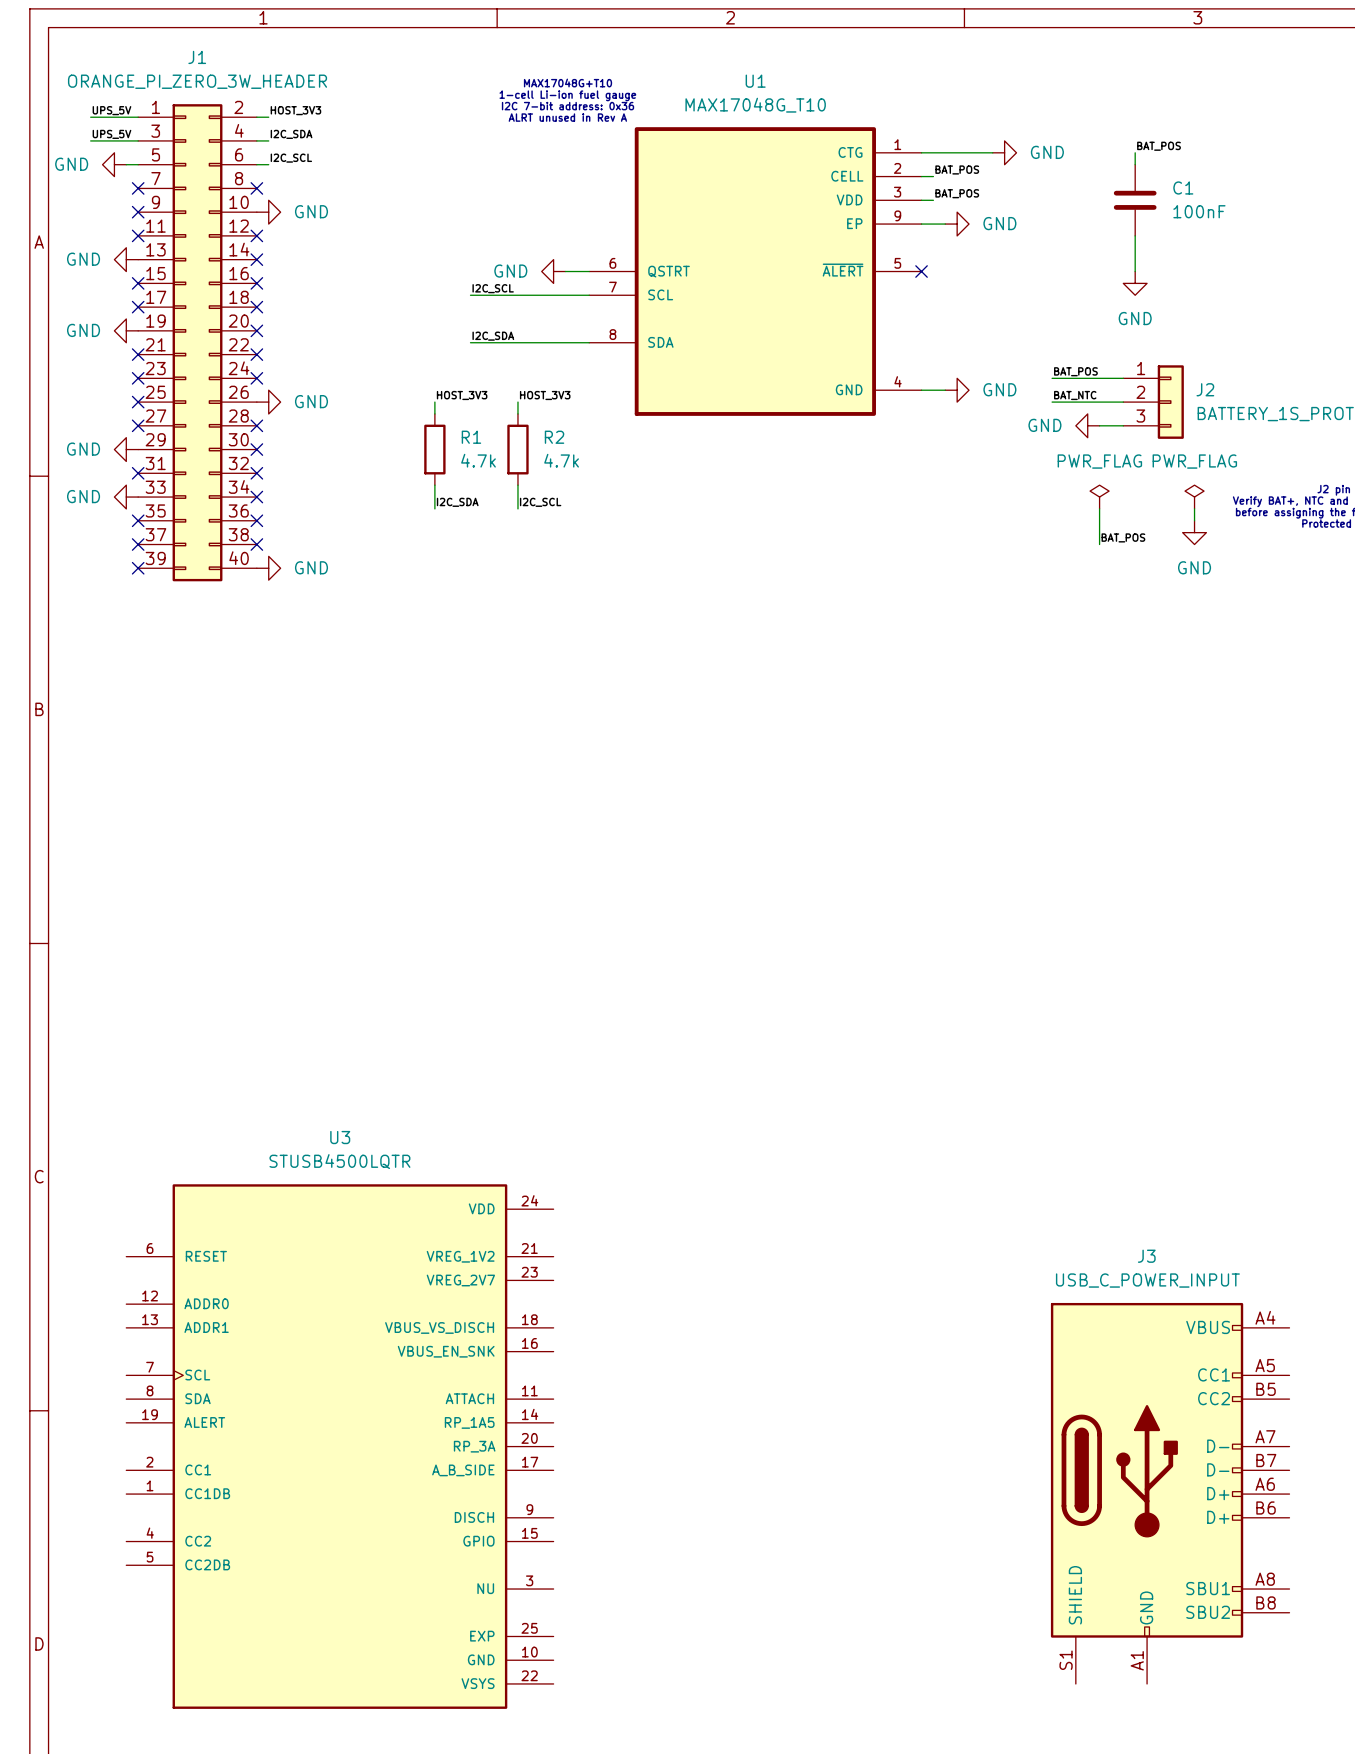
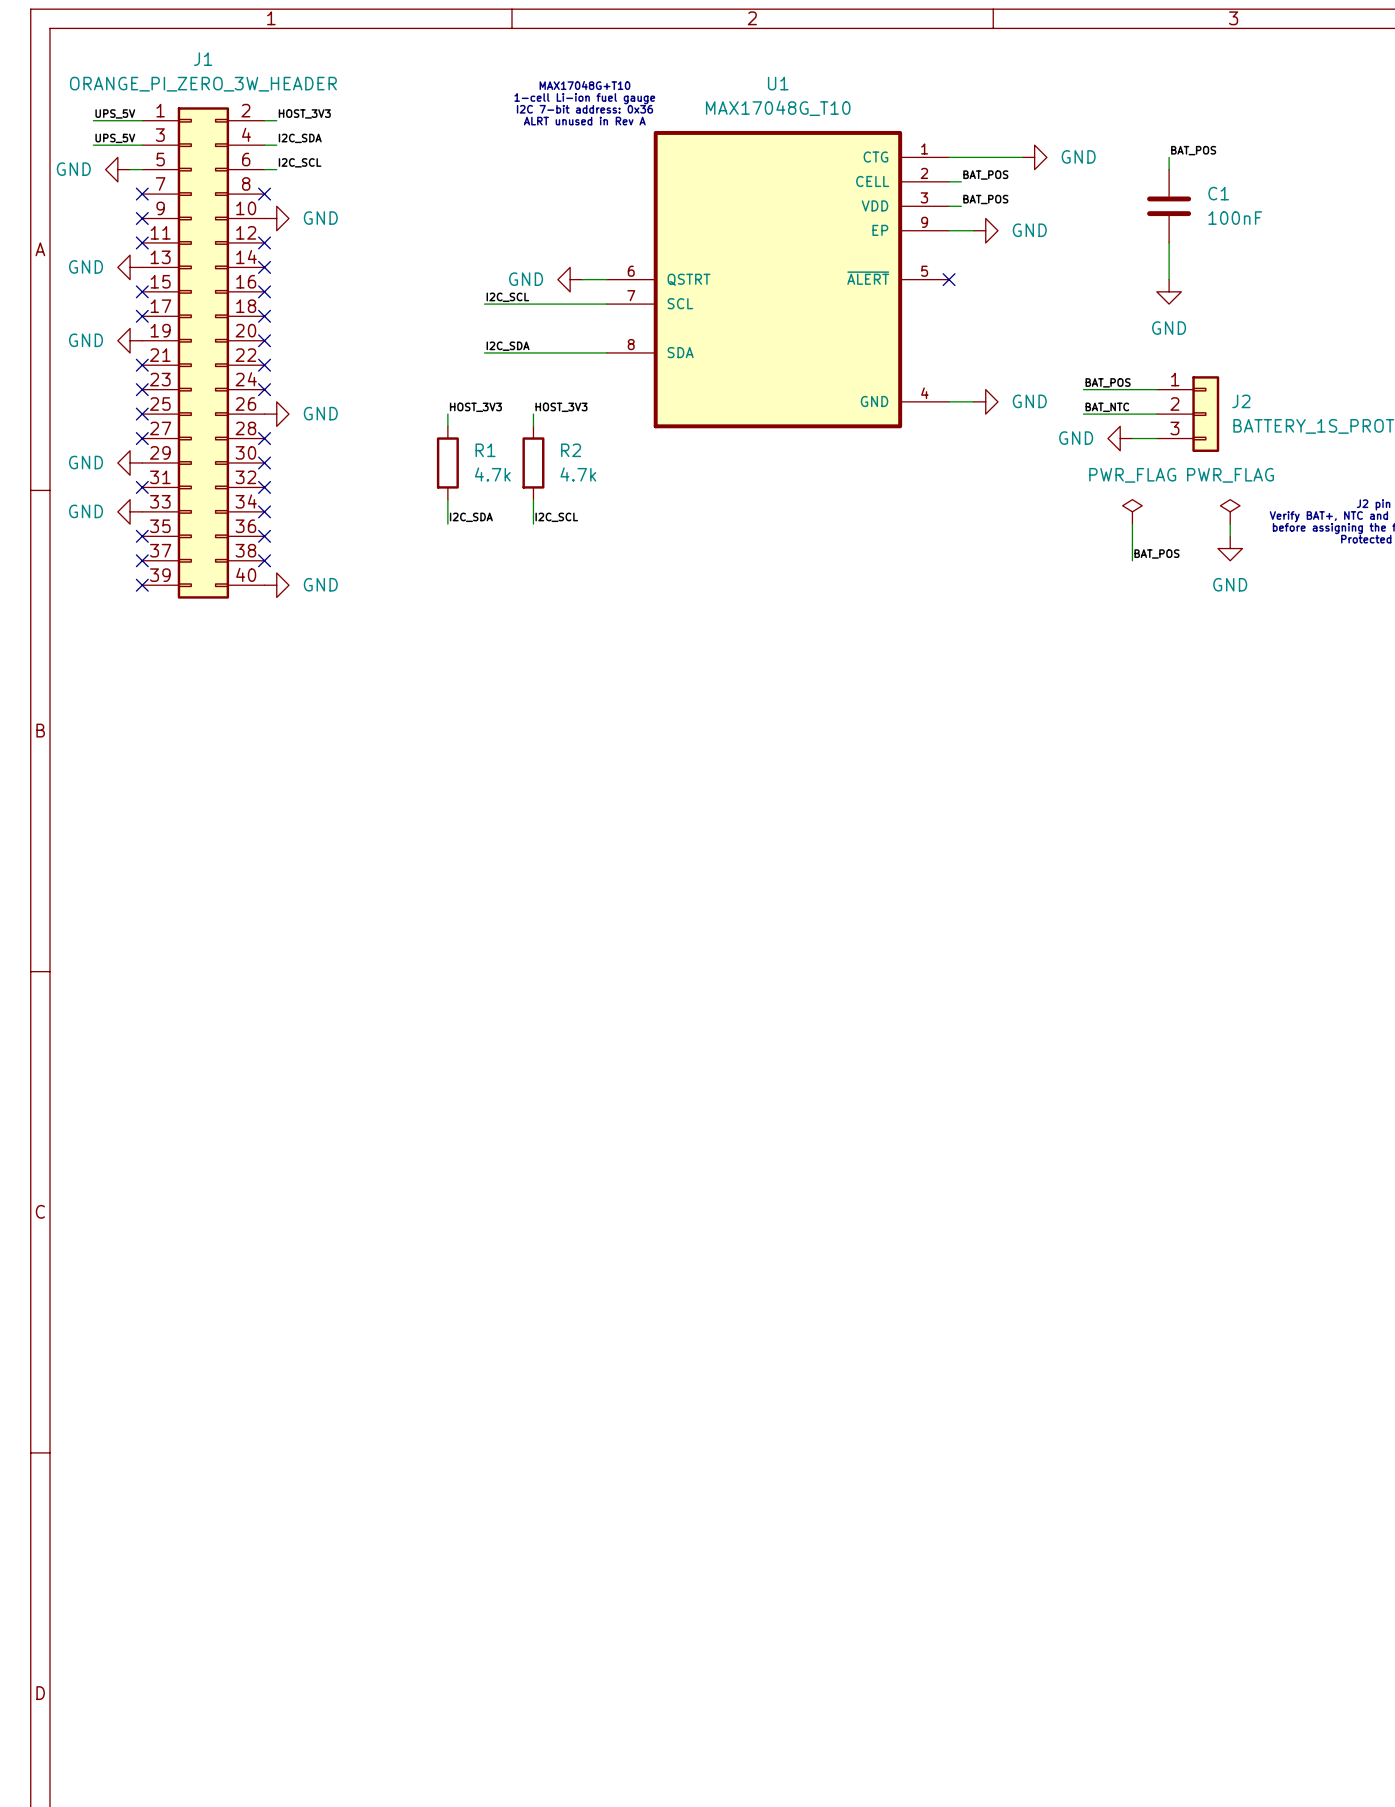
U3: STUSB4500LQTR (339, 1446) -> none
J3: USB_C_POWER_INPUT (1170, 1493) -> none

